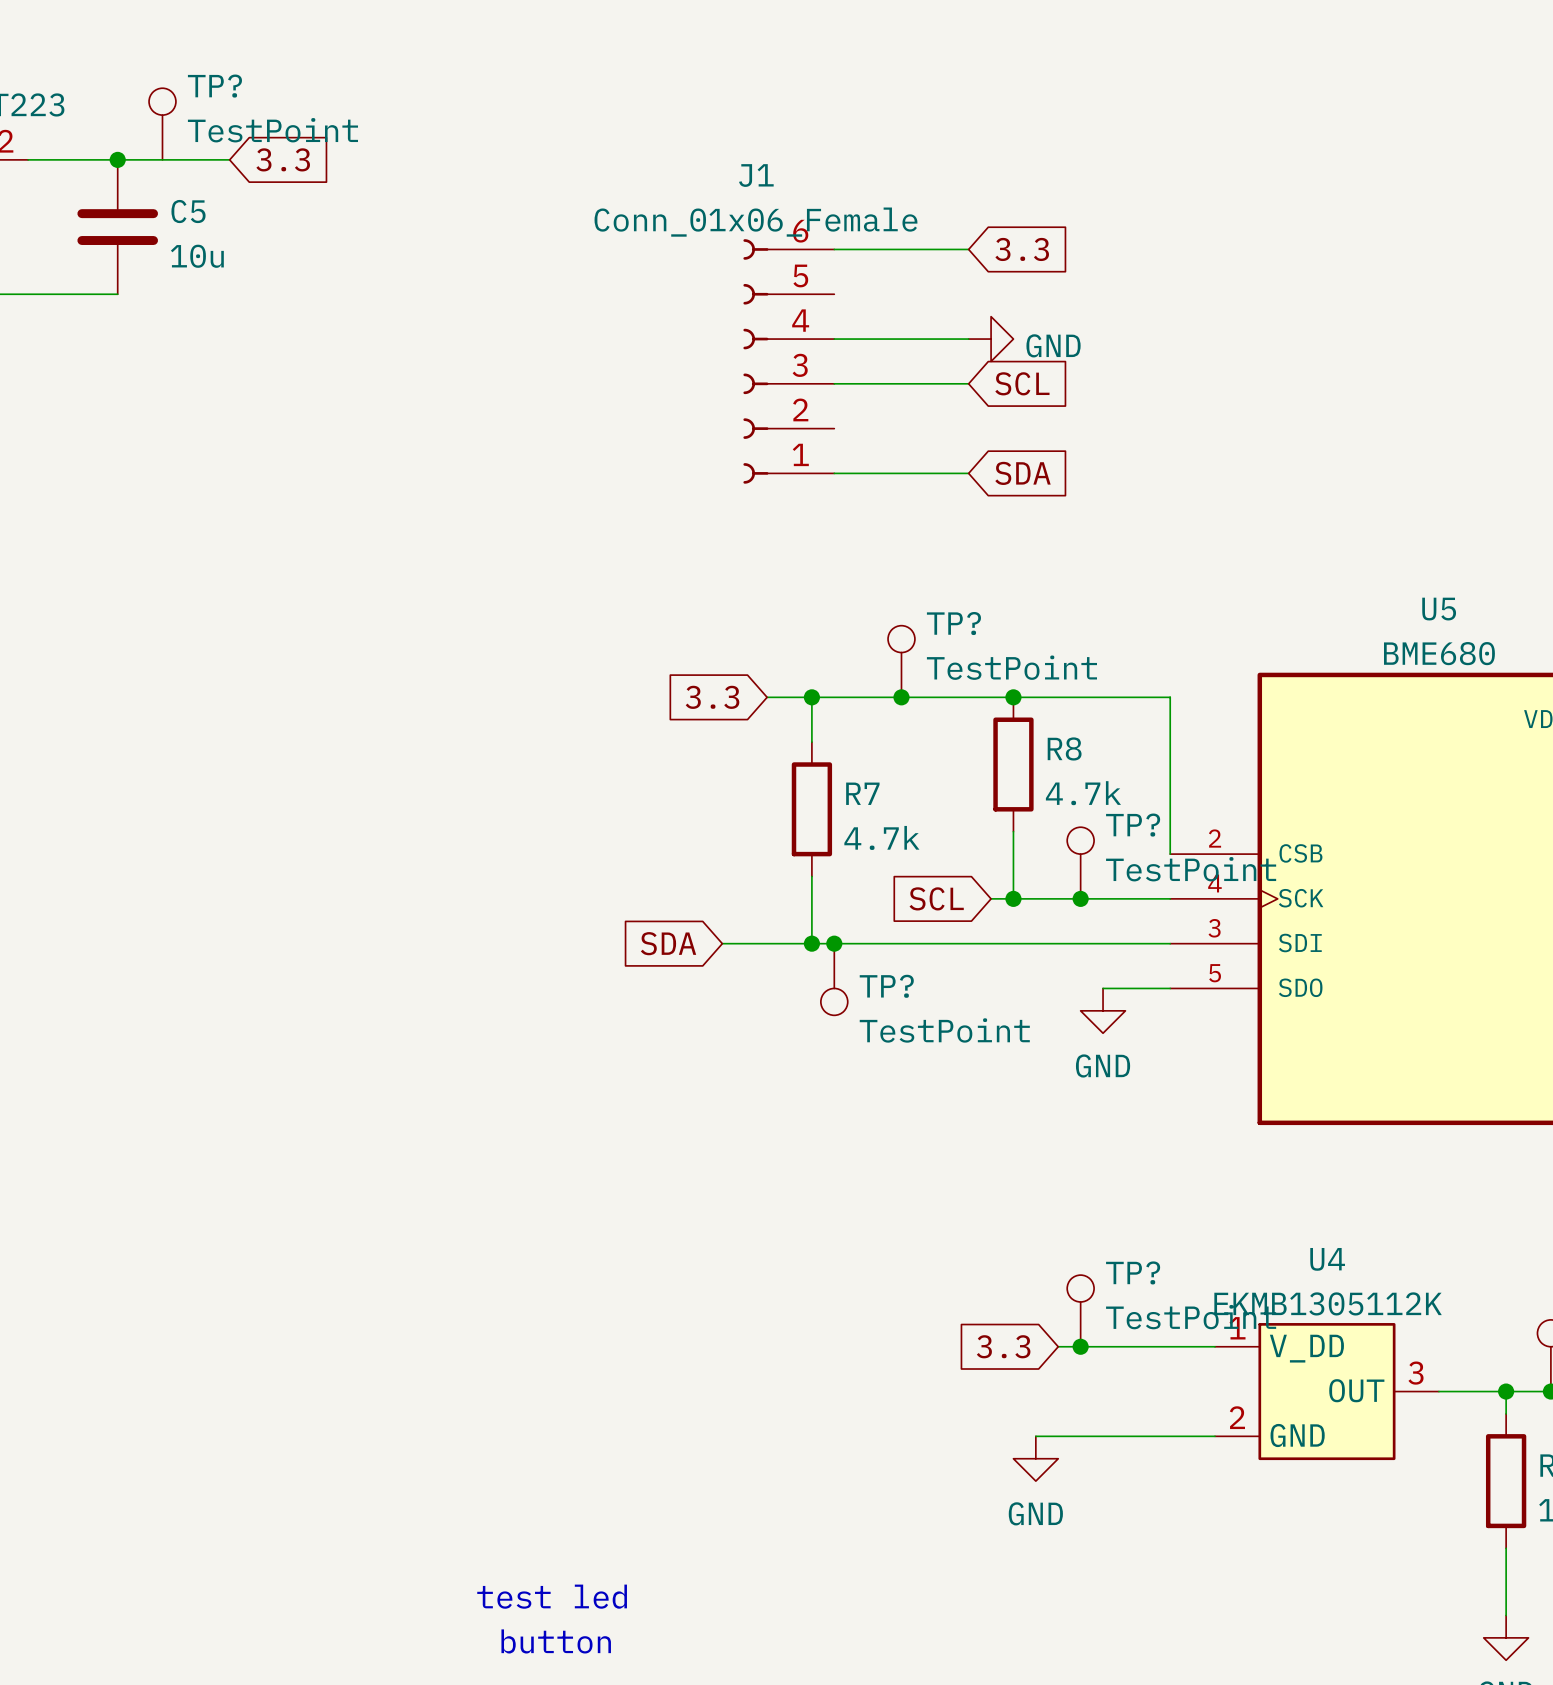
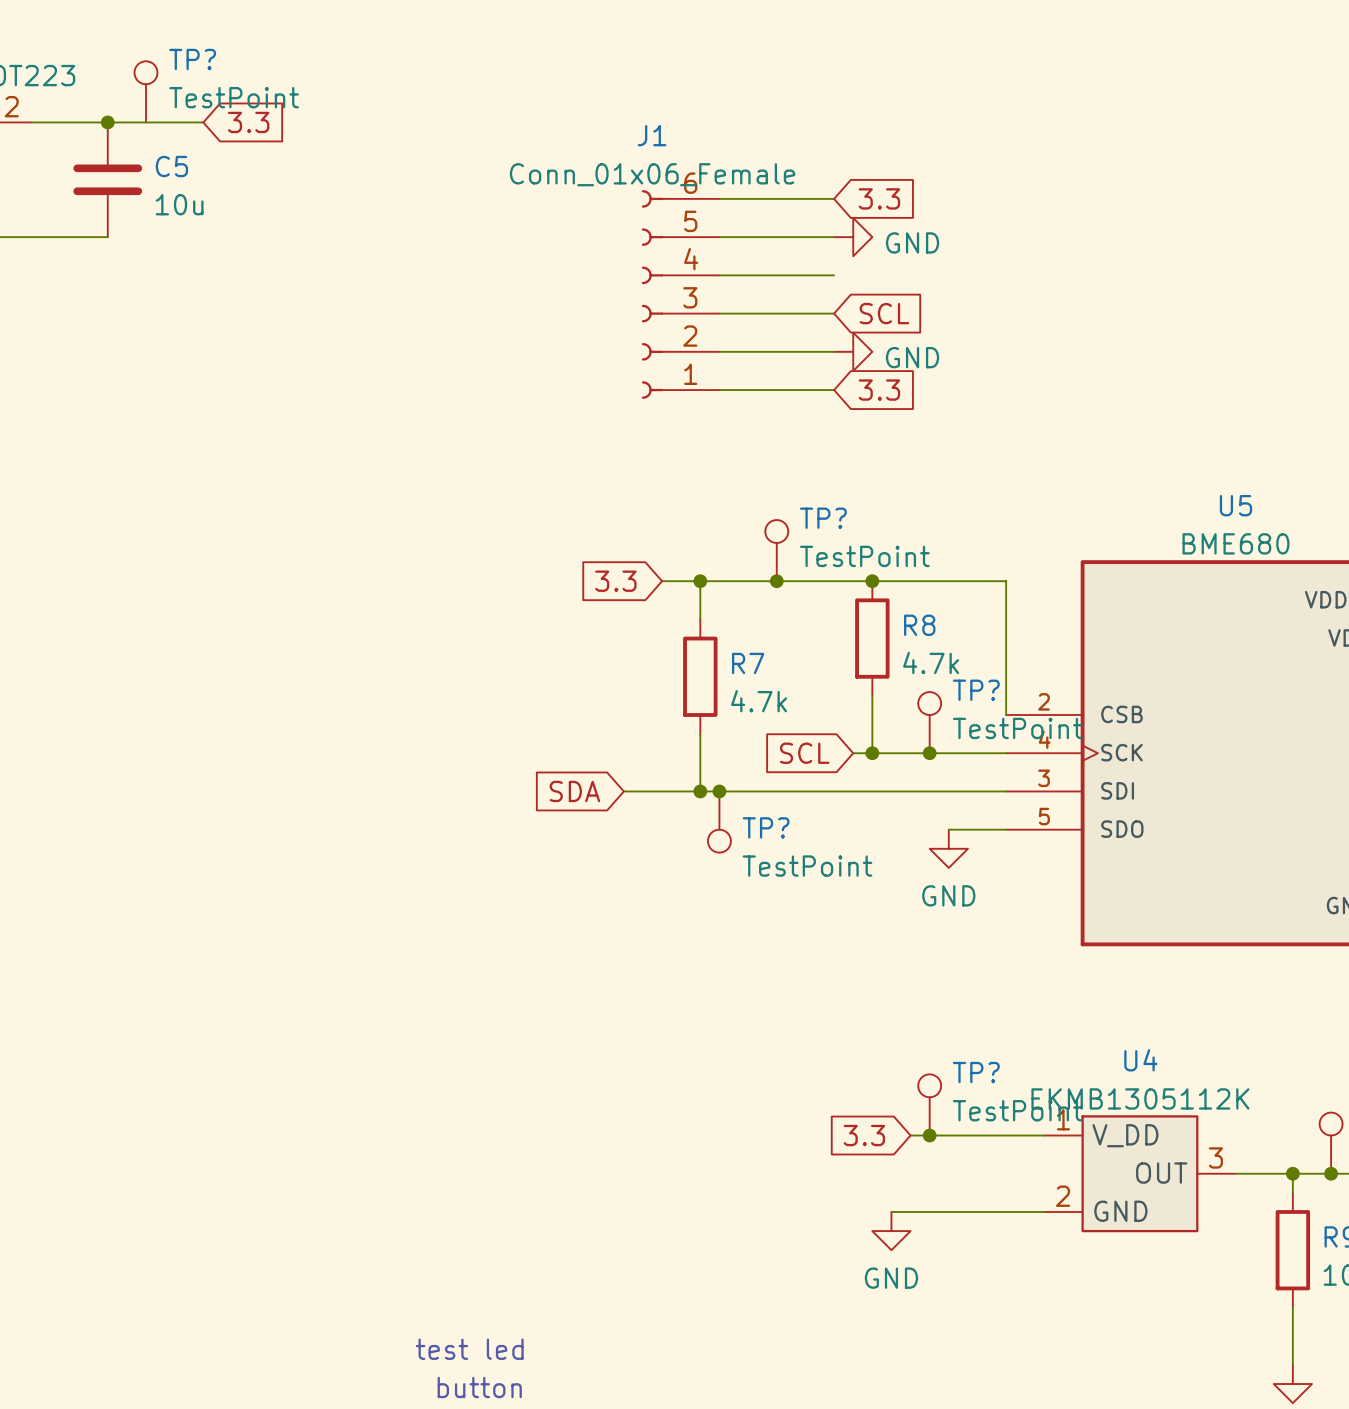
wire: none -> (719, 237) (834, 237)
power symbol: none -> GND (853, 237)
power symbol: GND (991, 339) -> none
wire: none -> (719, 351) (834, 351)
power symbol: none -> GND (853, 351)
global label: SDA (1022, 473) -> 3.3 (879, 390)

